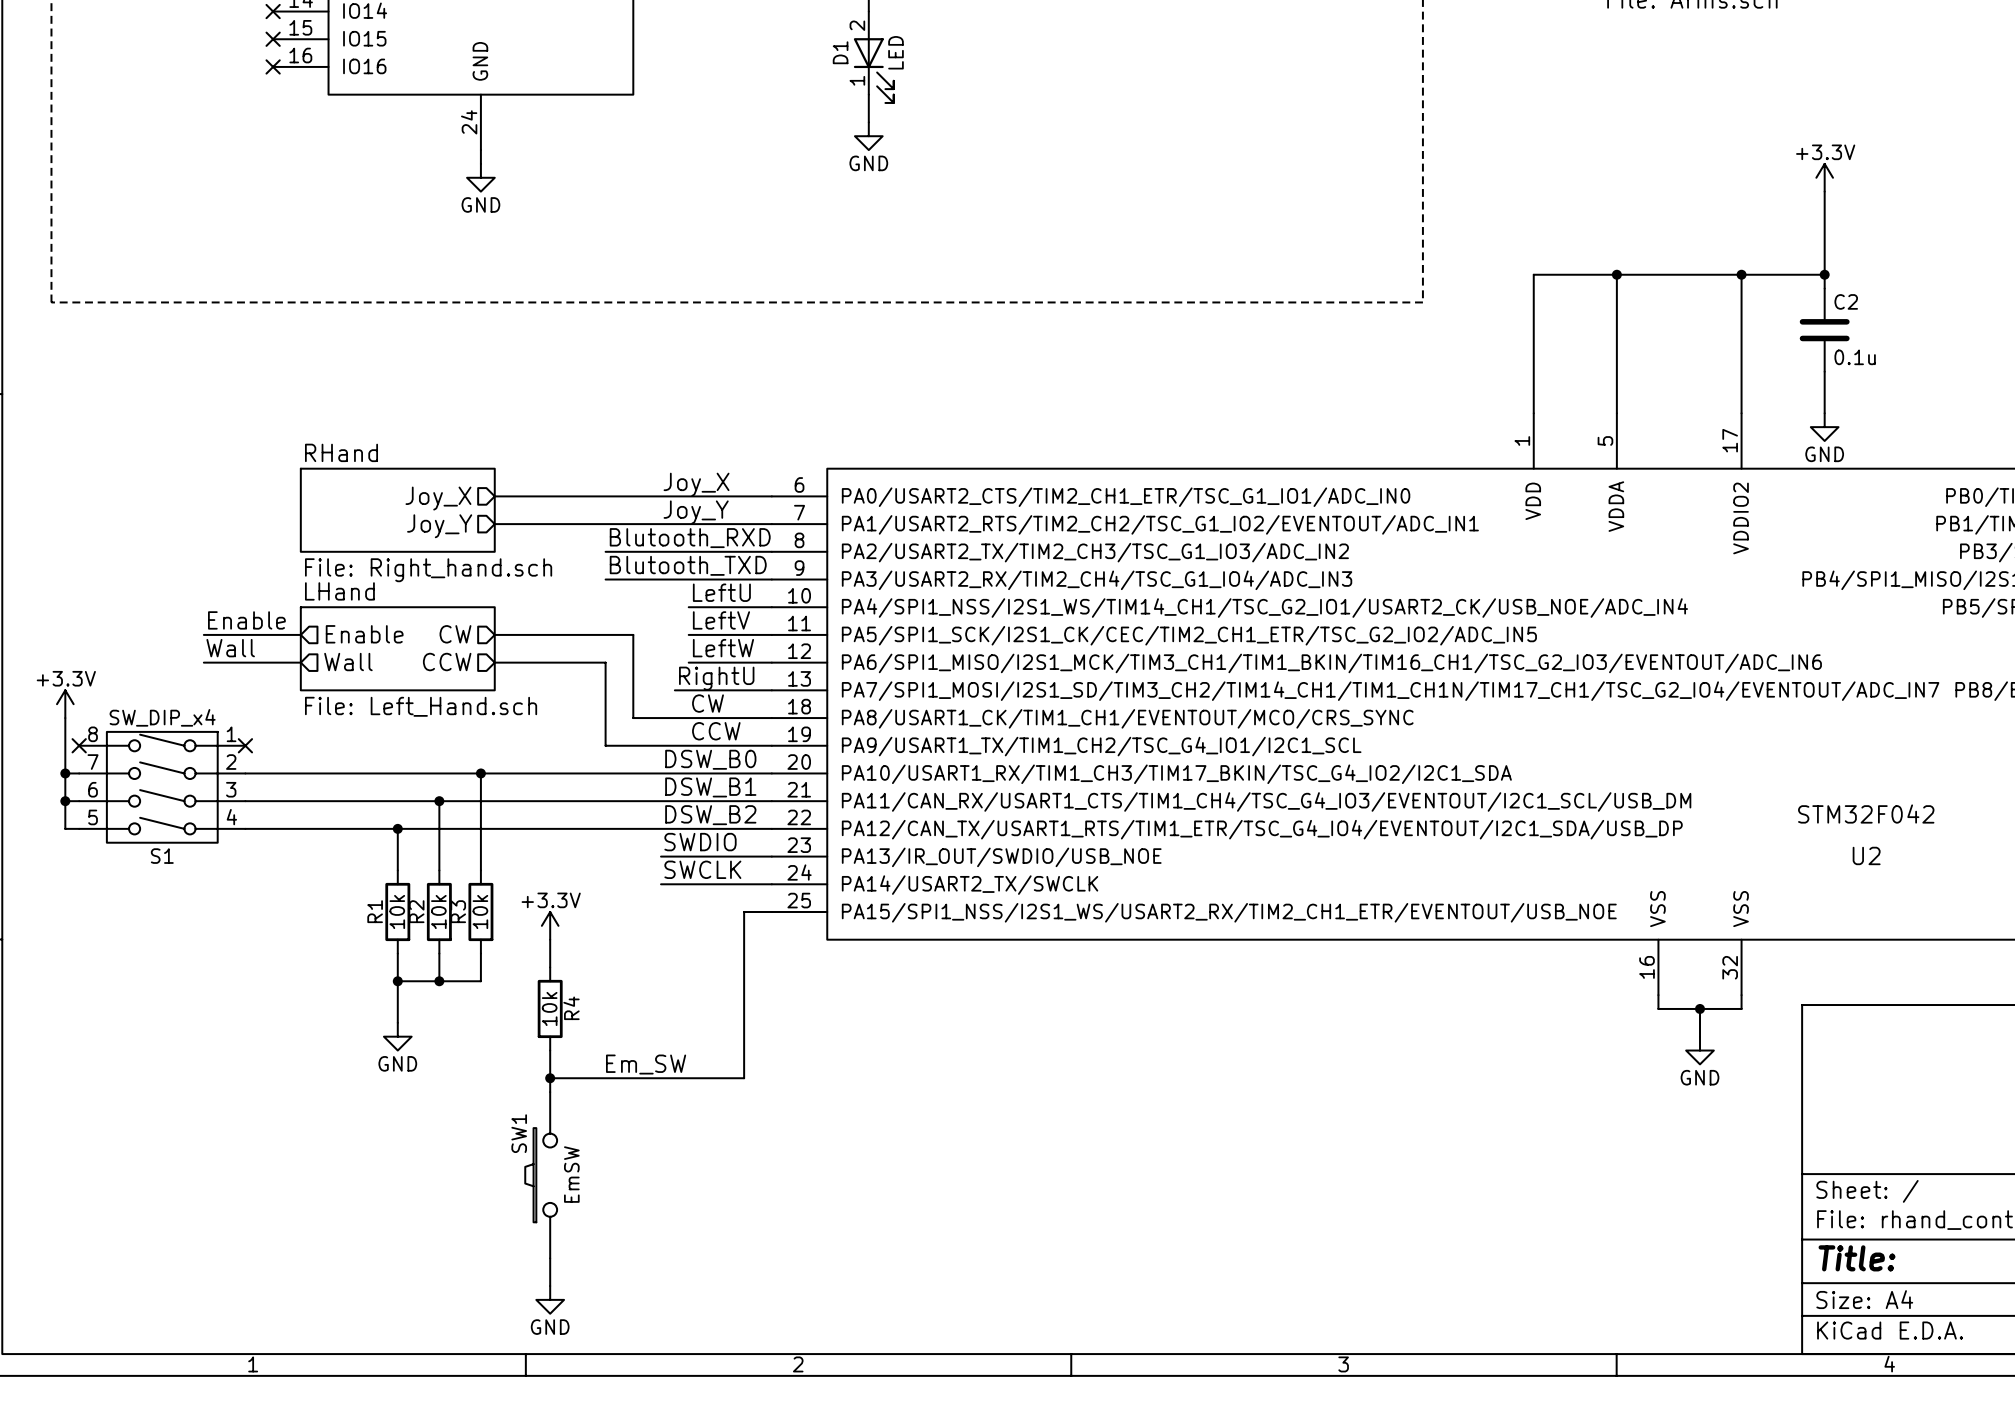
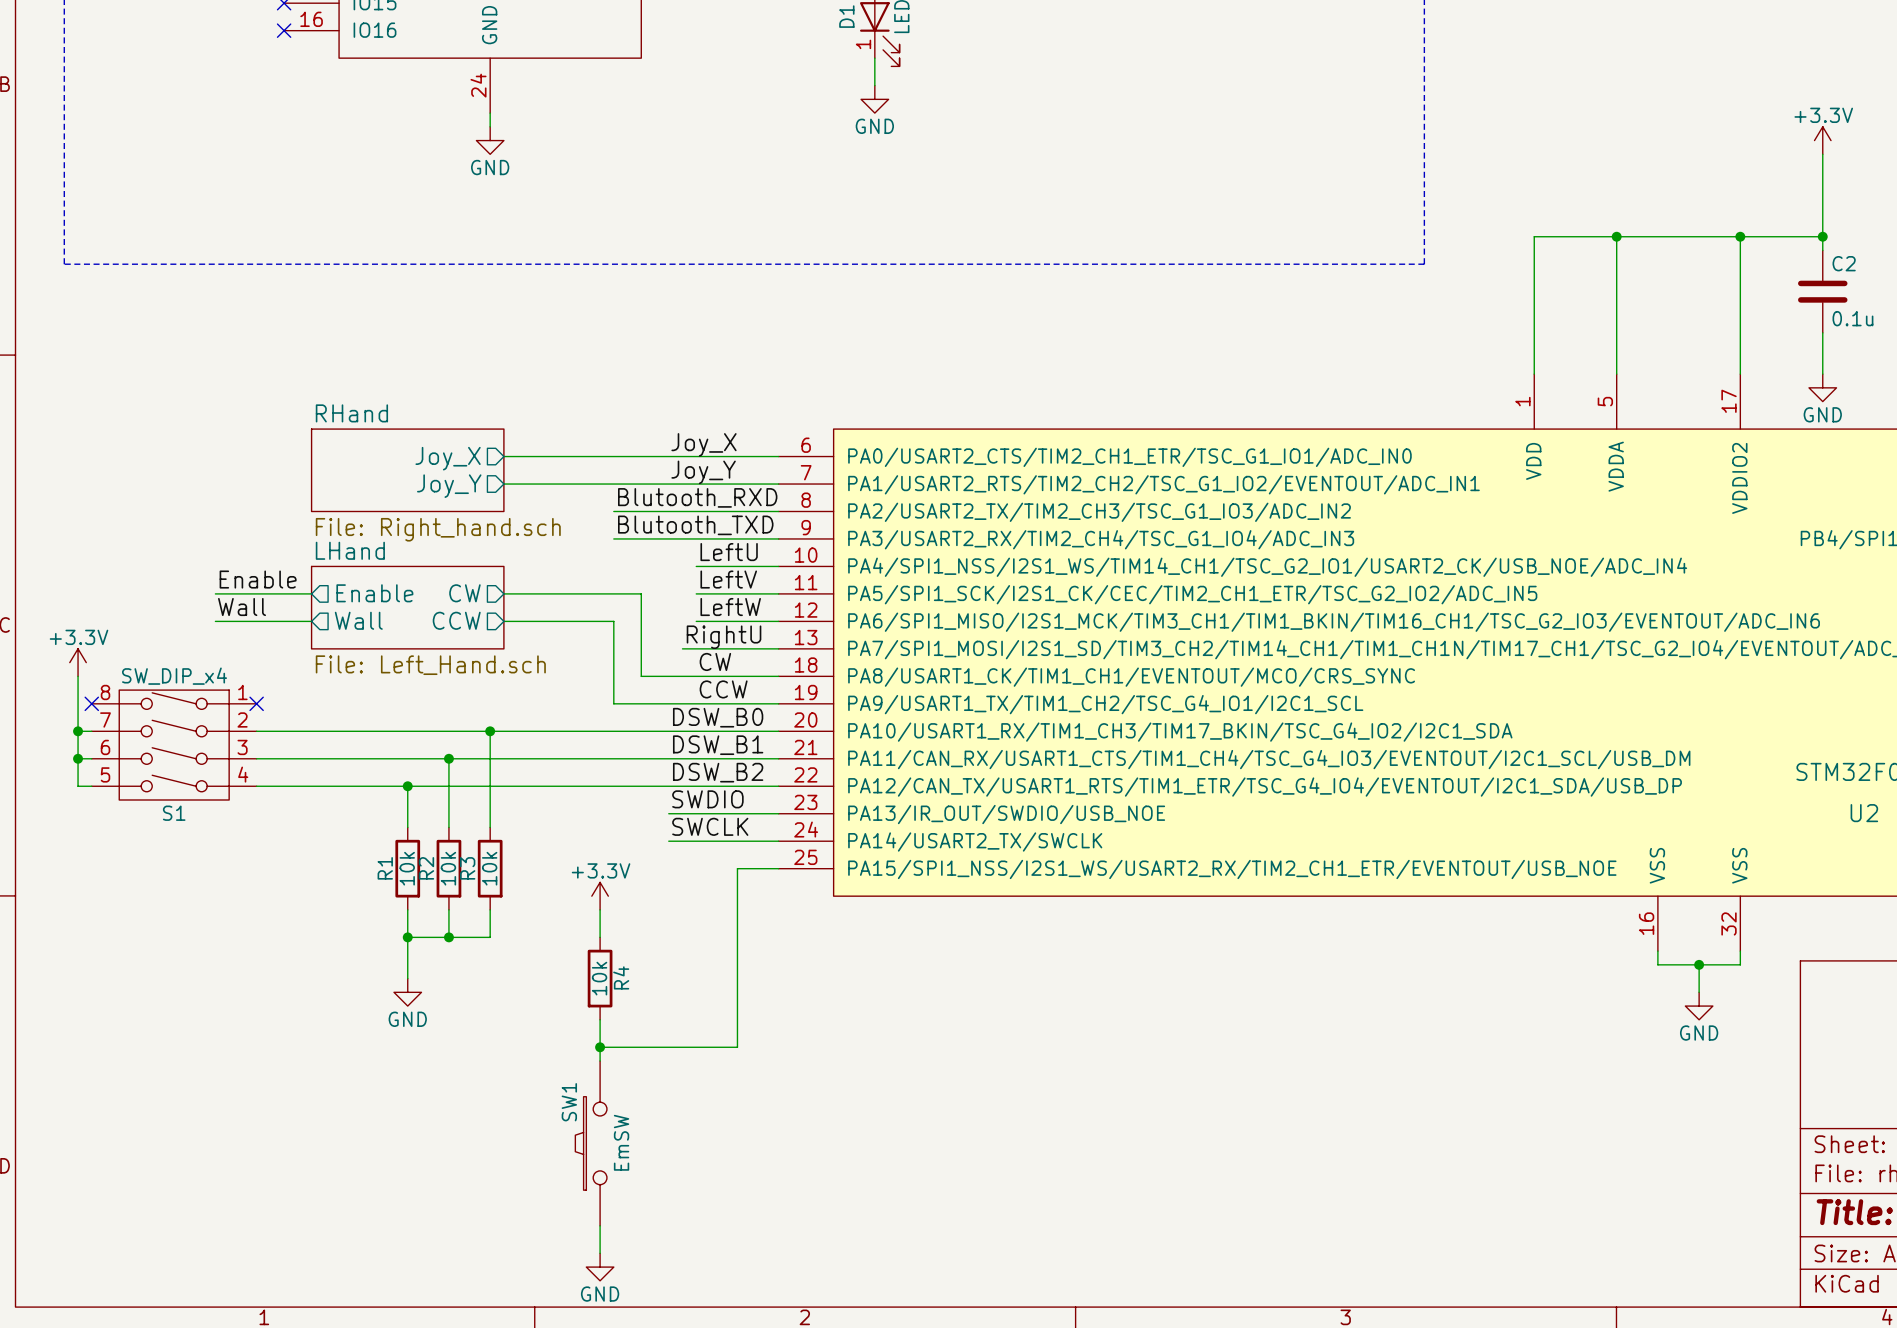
wire: (744, 911) (744, 1078) (550, 1078) -> (751, 868) (737, 868) (737, 1047) (600, 1047)
power symbol position: +3.3V (550, 925) -> +3.3V (600, 896)
wire: (550, 939) (550, 967) -> (600, 909) (600, 937)
R4 position: (550, 1008) -> (600, 978)
wire: (550, 1050) (550, 1092) -> (600, 1019) (600, 1061)
label: Em_SW (646, 1064) -> none
junction position: (550, 1078) -> (600, 1047)
SW1 position: (541, 1175) -> (591, 1143)
wire: (550, 1258) (550, 1286) -> (600, 1225) (600, 1253)
power symbol position: GND (550, 1299) -> GND (600, 1267)

